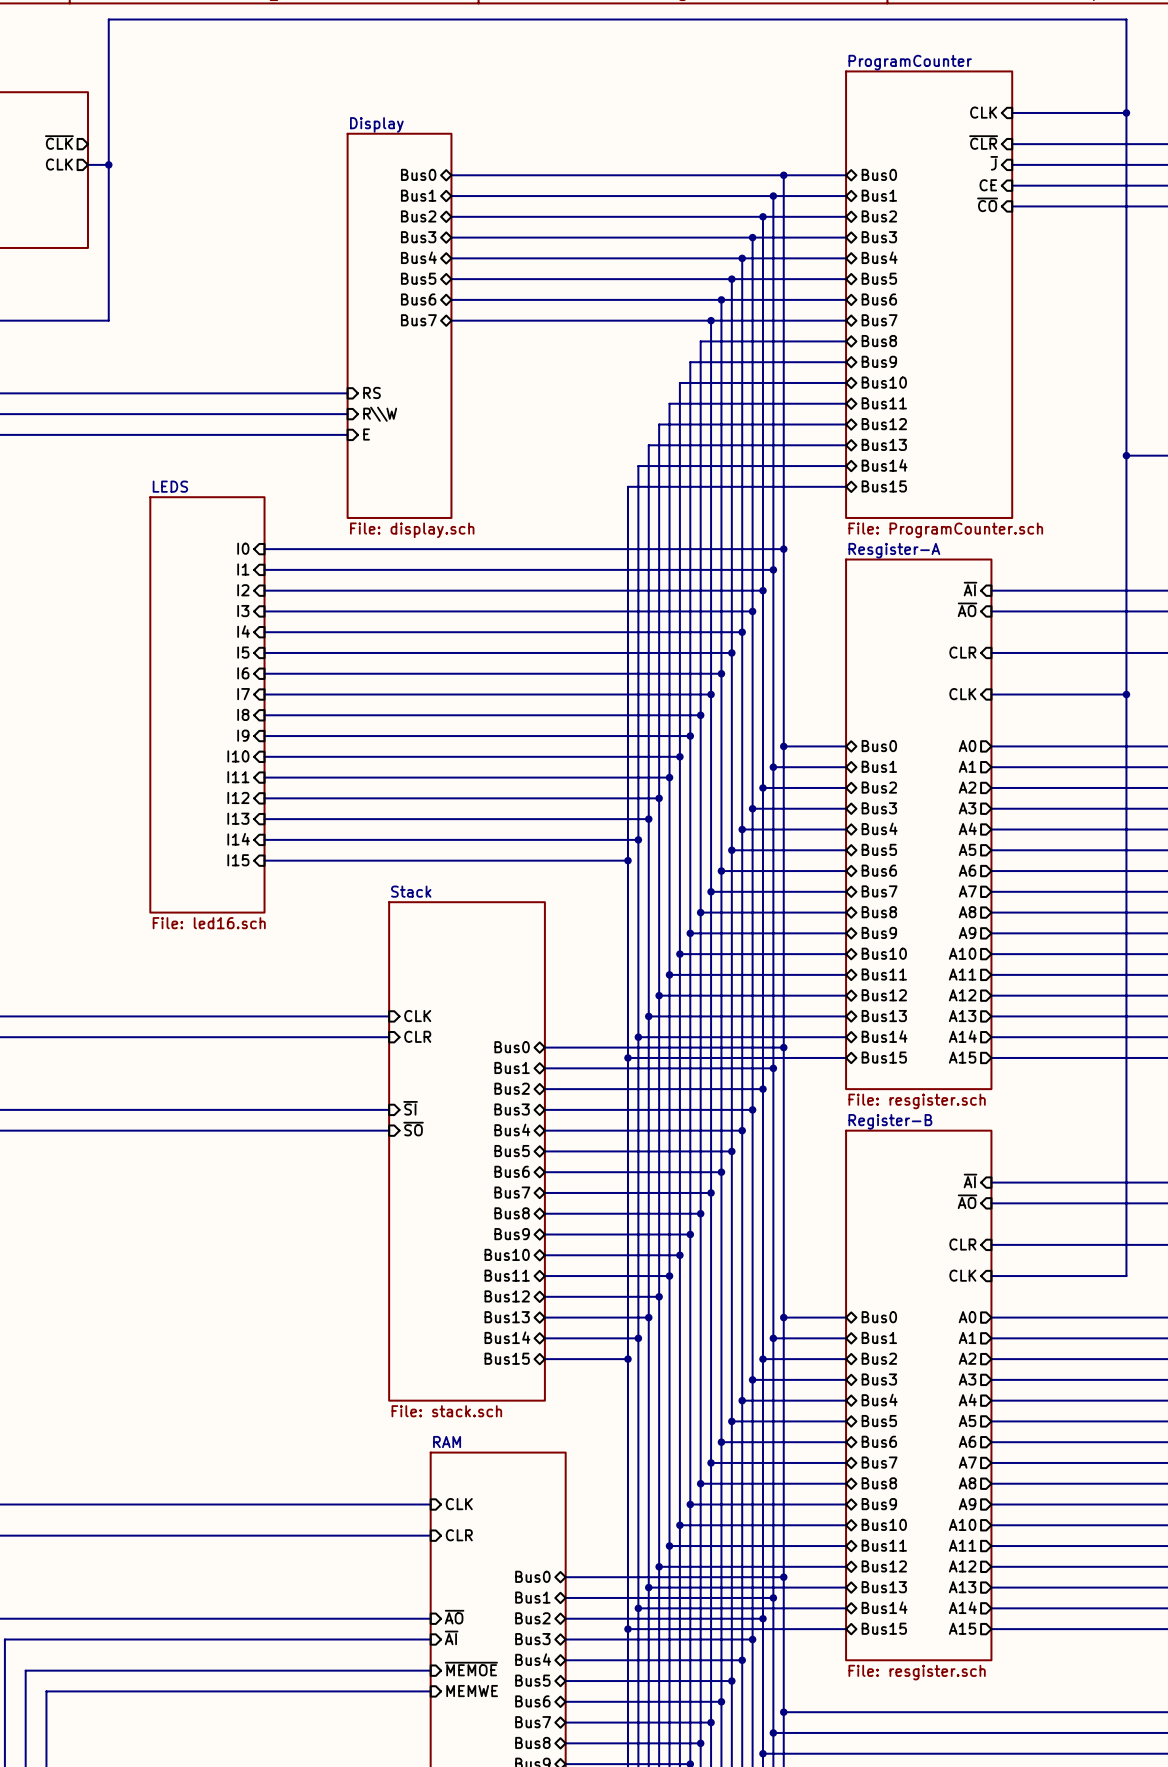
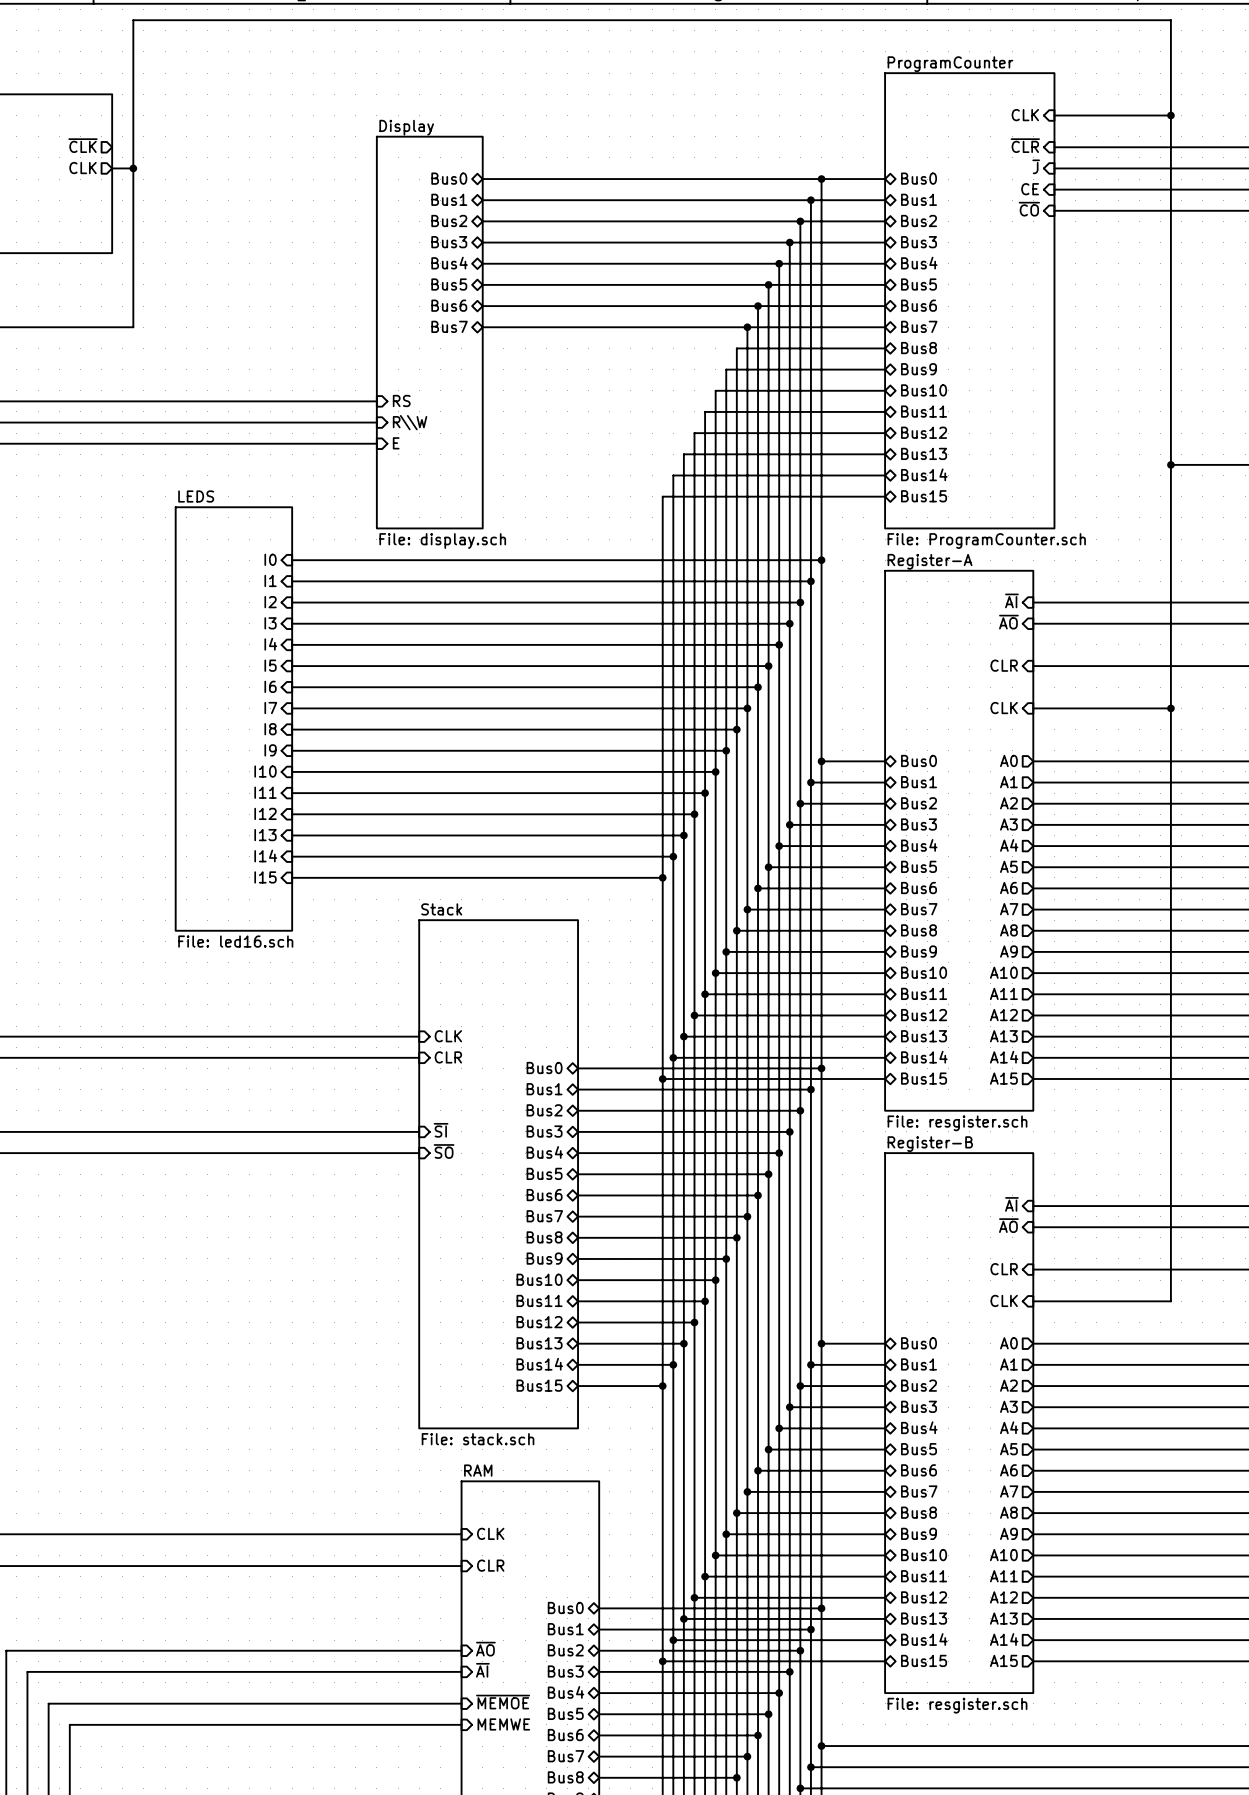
sheet Resgister-A name: Resgister-A (894, 550) -> Register-A (930, 561)

